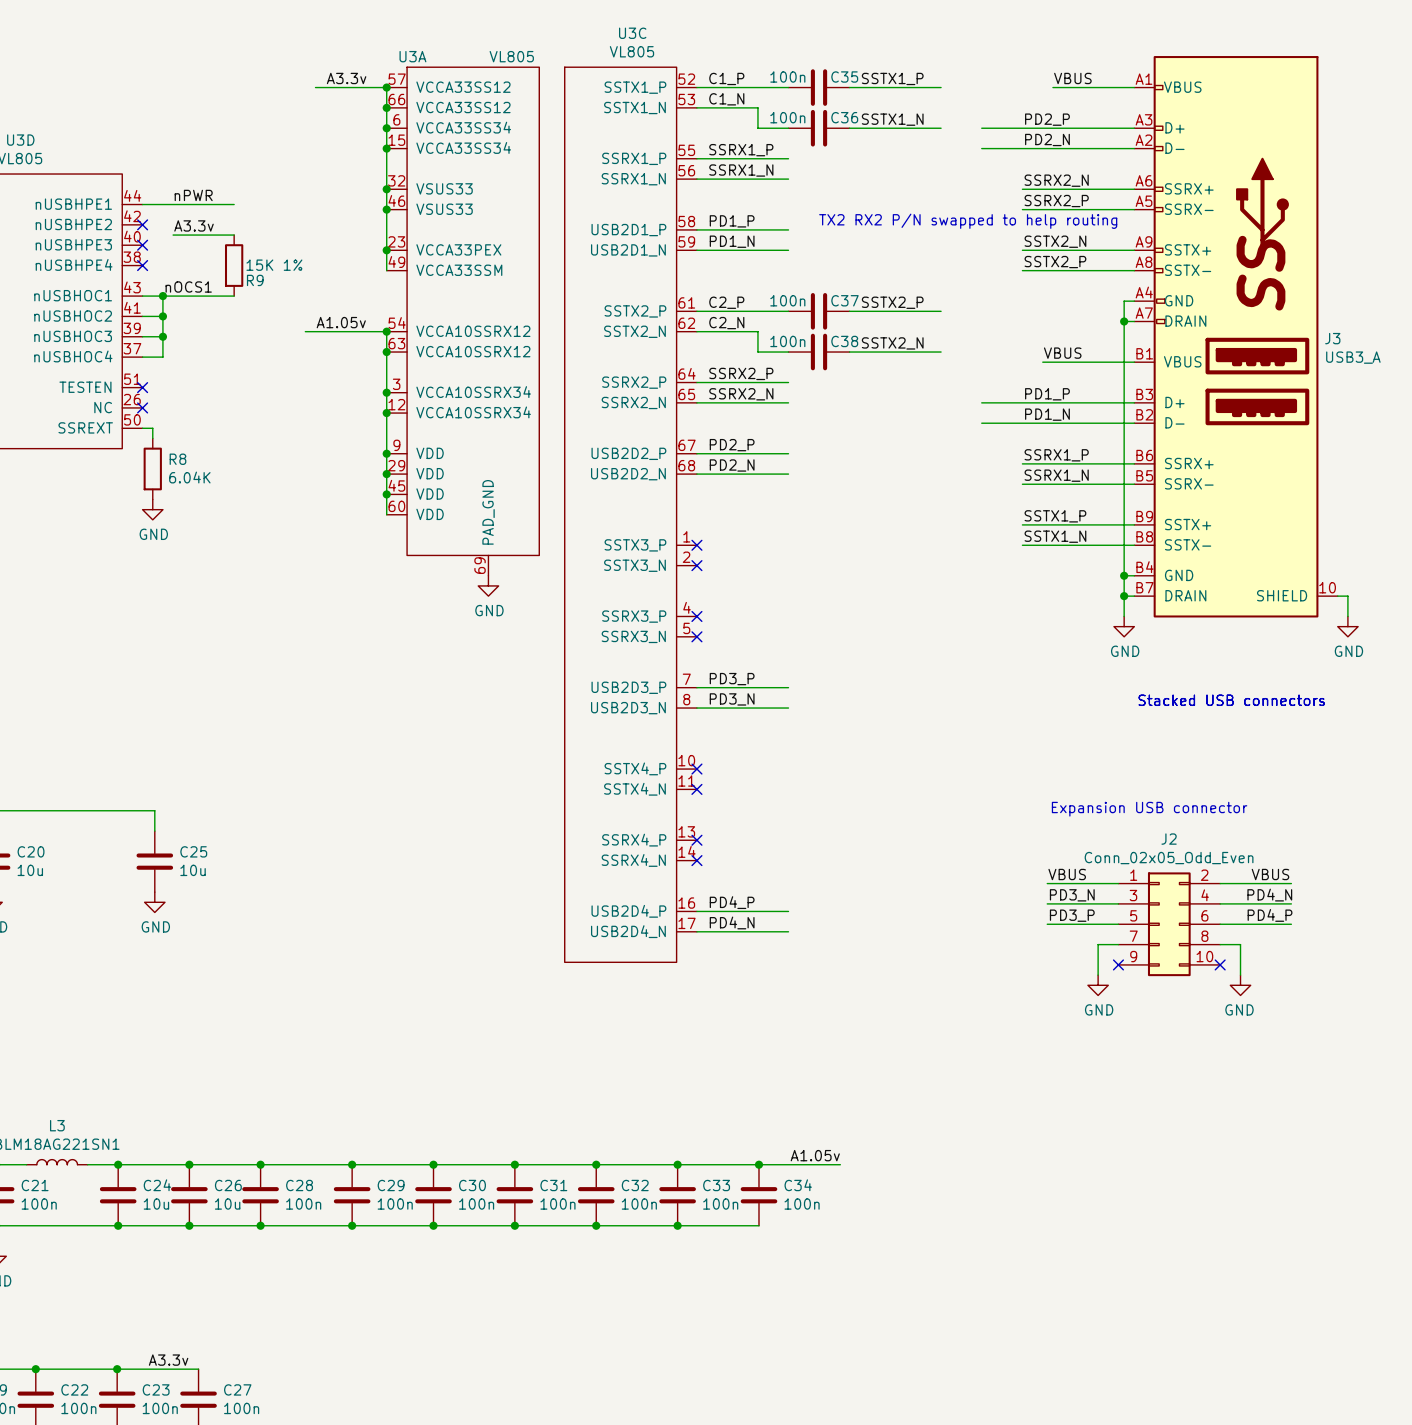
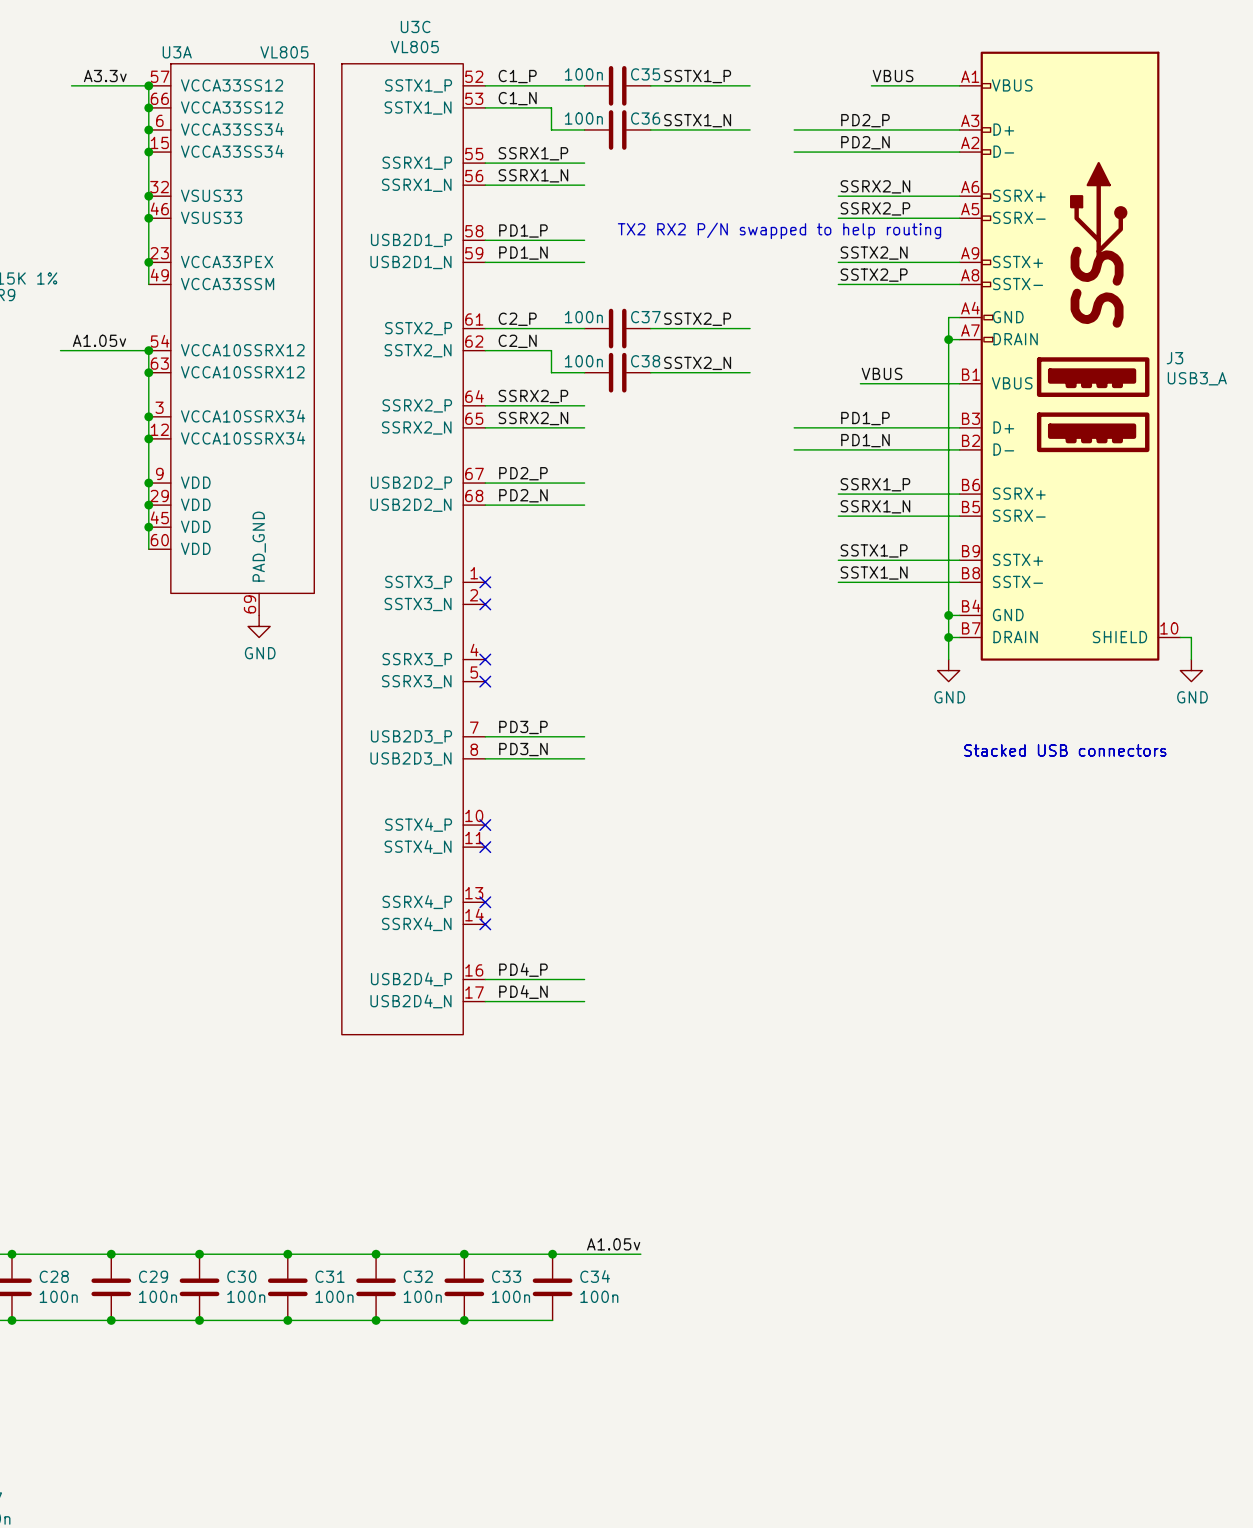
text: Expansion USB connector (1149, 809) -> none
label: VBUS (1067, 874) -> none
label: VBUS (1270, 874) -> none
wire: (1047, 883) (1118, 883) -> none
wire: (1220, 883) (1291, 883) -> none
label: PD3_N (1072, 895) -> none
label: PD4_N (1269, 895) -> none
wire: (1047, 903) (1118, 903) -> none
wire: (1220, 903) (1291, 903) -> none
label: PD3_P (1072, 915) -> none
label: PD4_P (1270, 915) -> none
wire: (1047, 924) (1118, 924) -> none
J2: Conn_02x05_Odd_Even (1169, 924) -> none
wire: (1220, 924) (1291, 924) -> none
wire: (1118, 944) (1098, 944) (1098, 975) -> none
wire: (1220, 944) (1240, 944) (1240, 975) -> none
no-connect mark: (1118, 964) -> none
no-connect mark: (1220, 964) -> none
power symbol: GND (1098, 985) -> none
power symbol: GND (1240, 985) -> none

